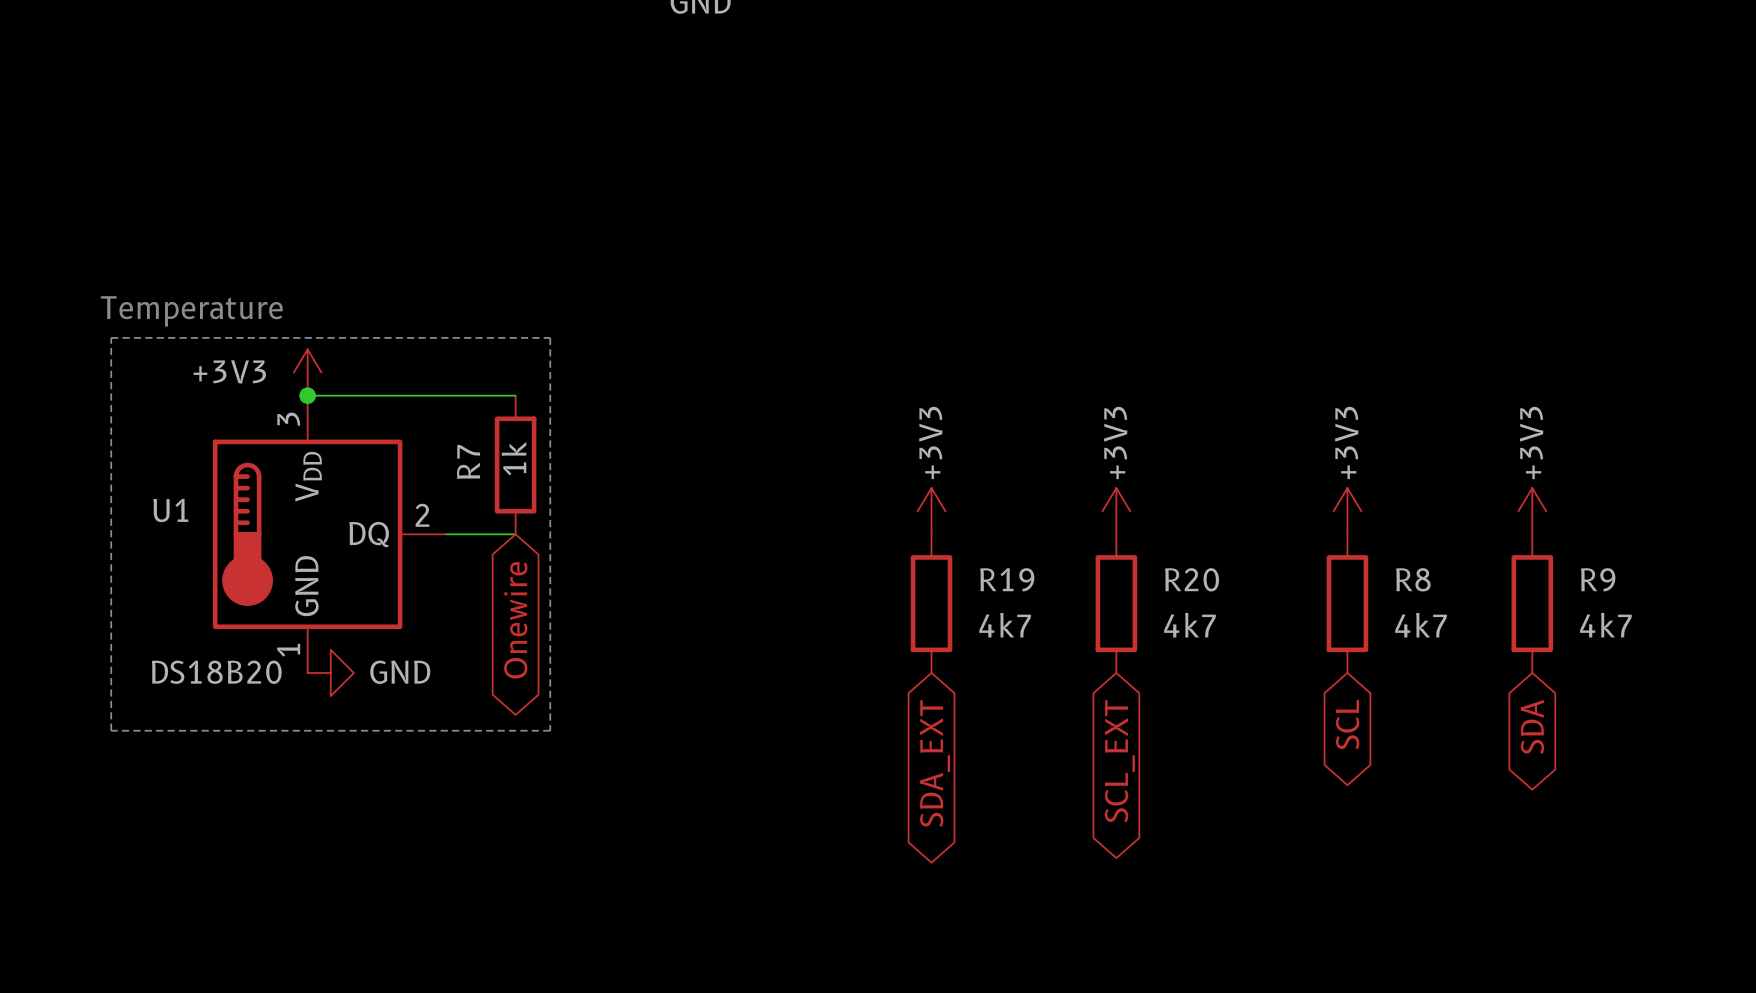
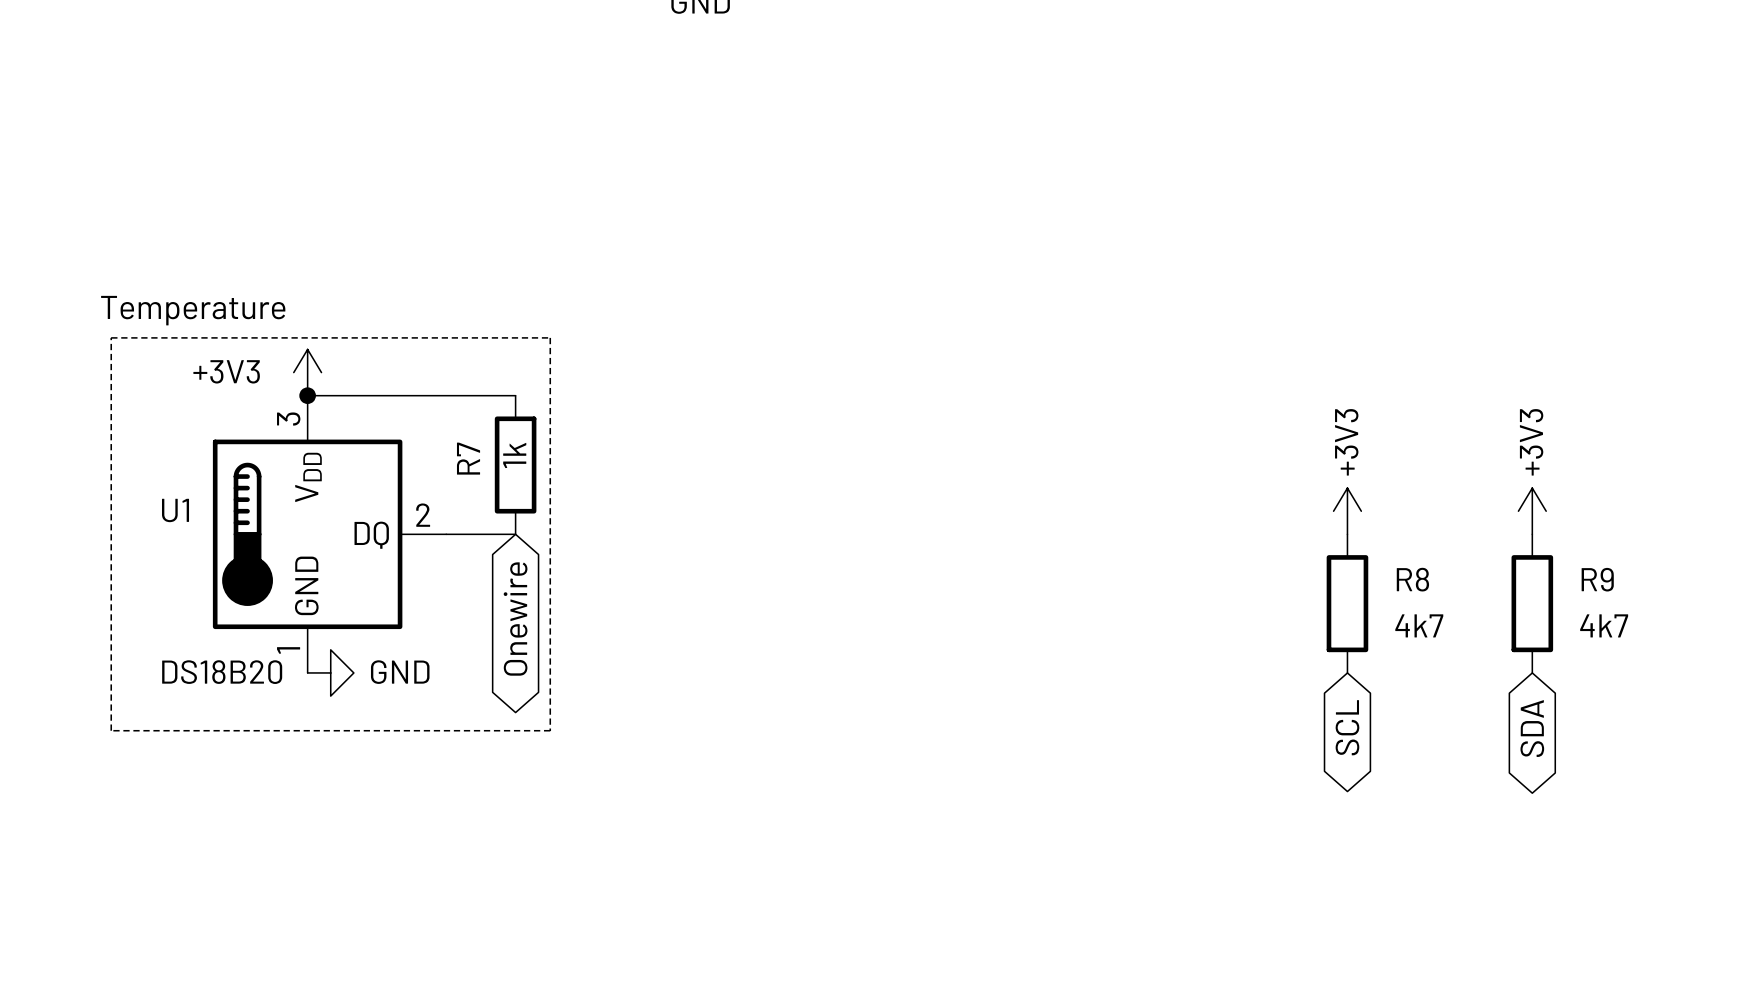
power symbol: +3V3 (931, 511) -> none
power symbol: +3V3 (1116, 511) -> none
R19: 4k7 (931, 603) -> none
R20: 4k7 (1116, 603) -> none
global label: SCL_EXT (1119, 761) -> none
global label: SDA_EXT (934, 763) -> none

